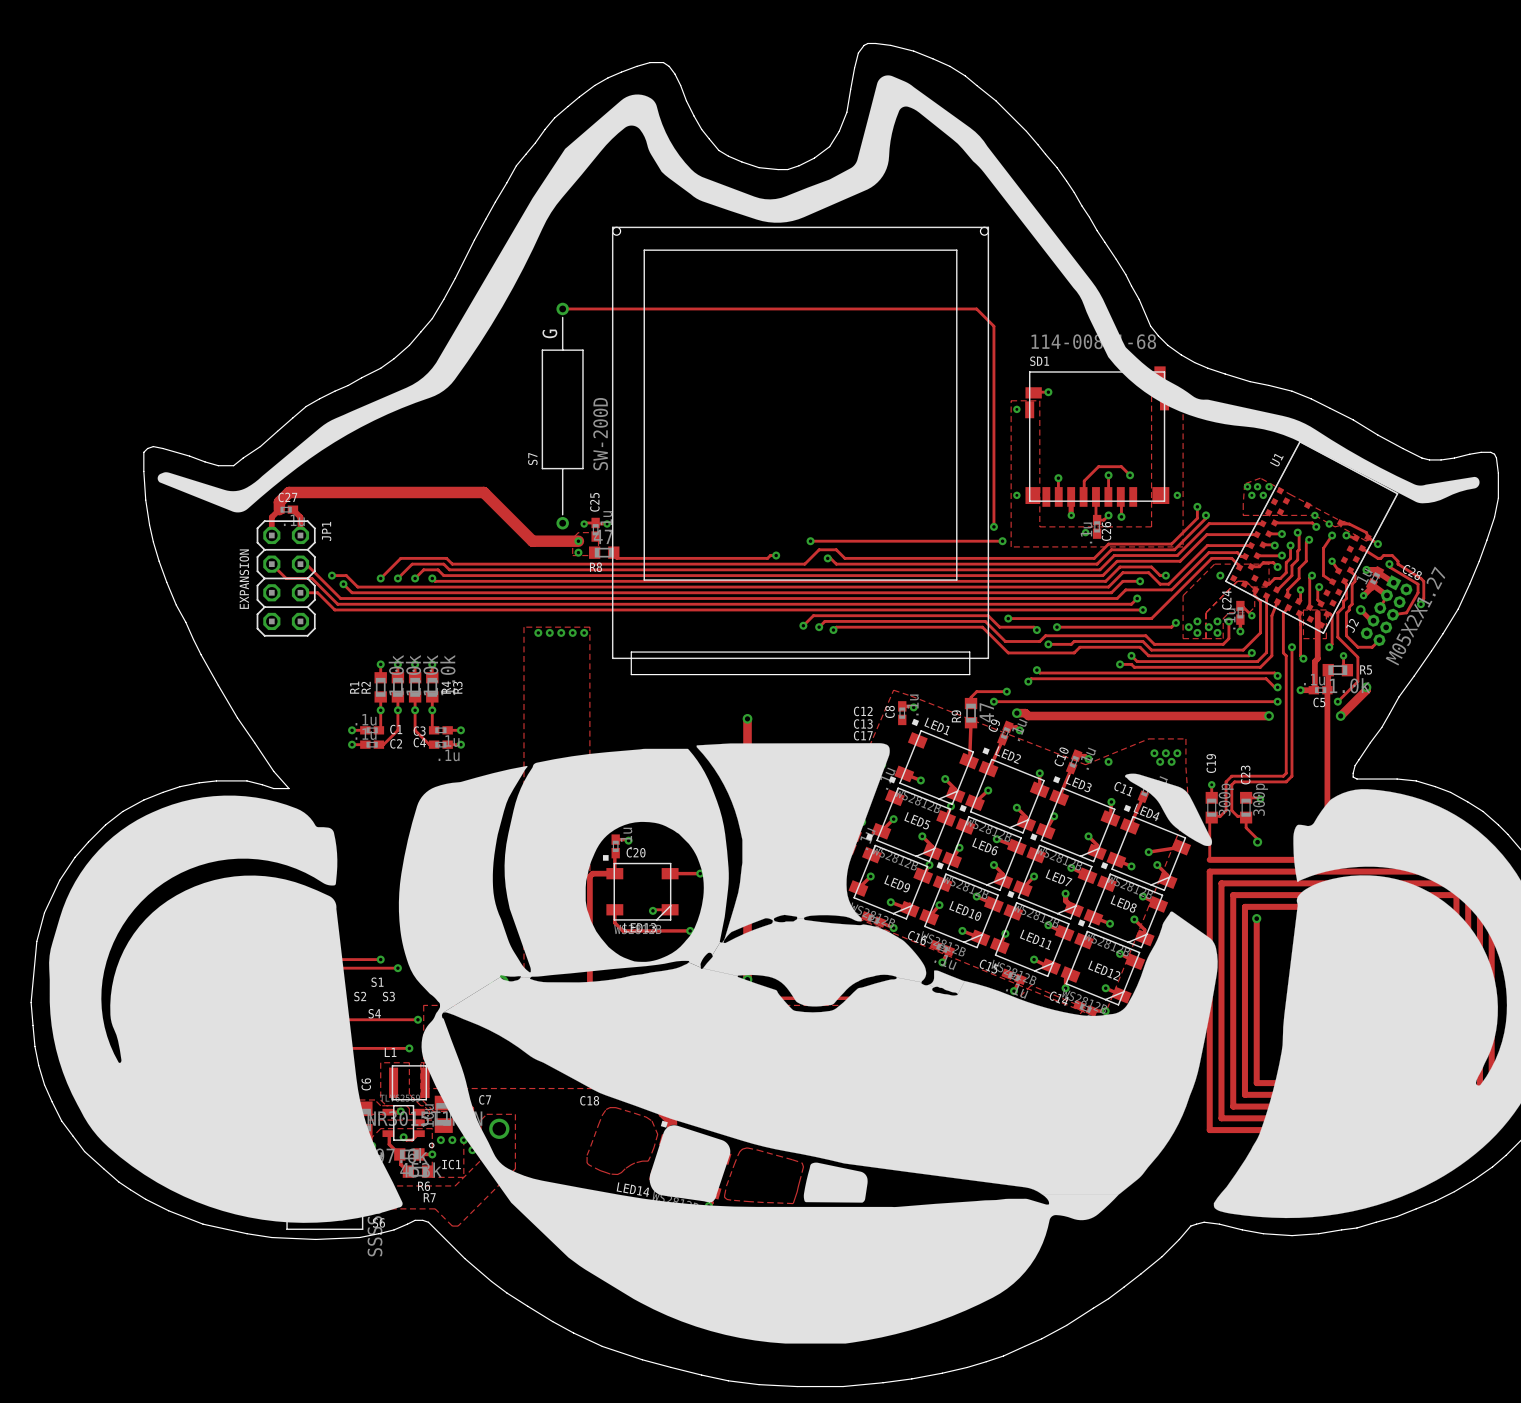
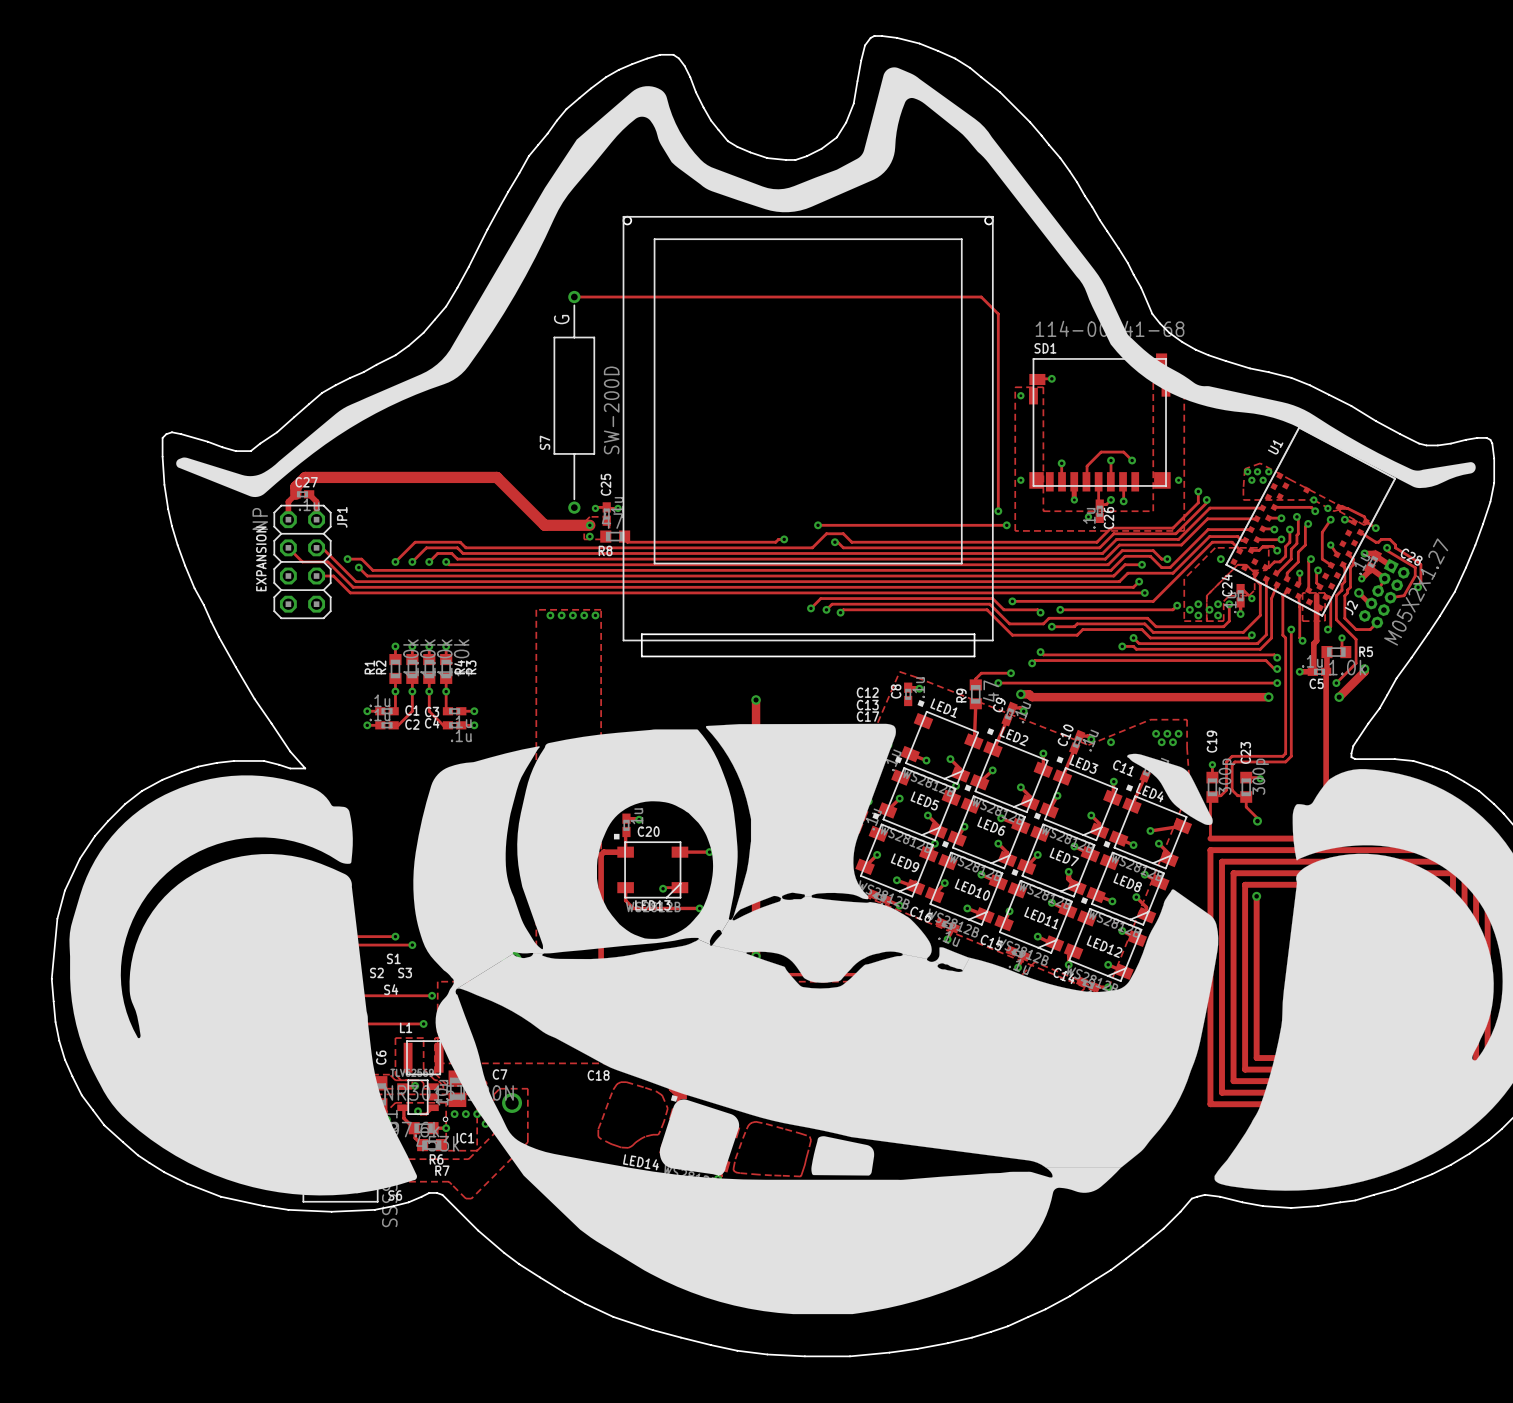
JP1 value: none -> NP (260, 519)

